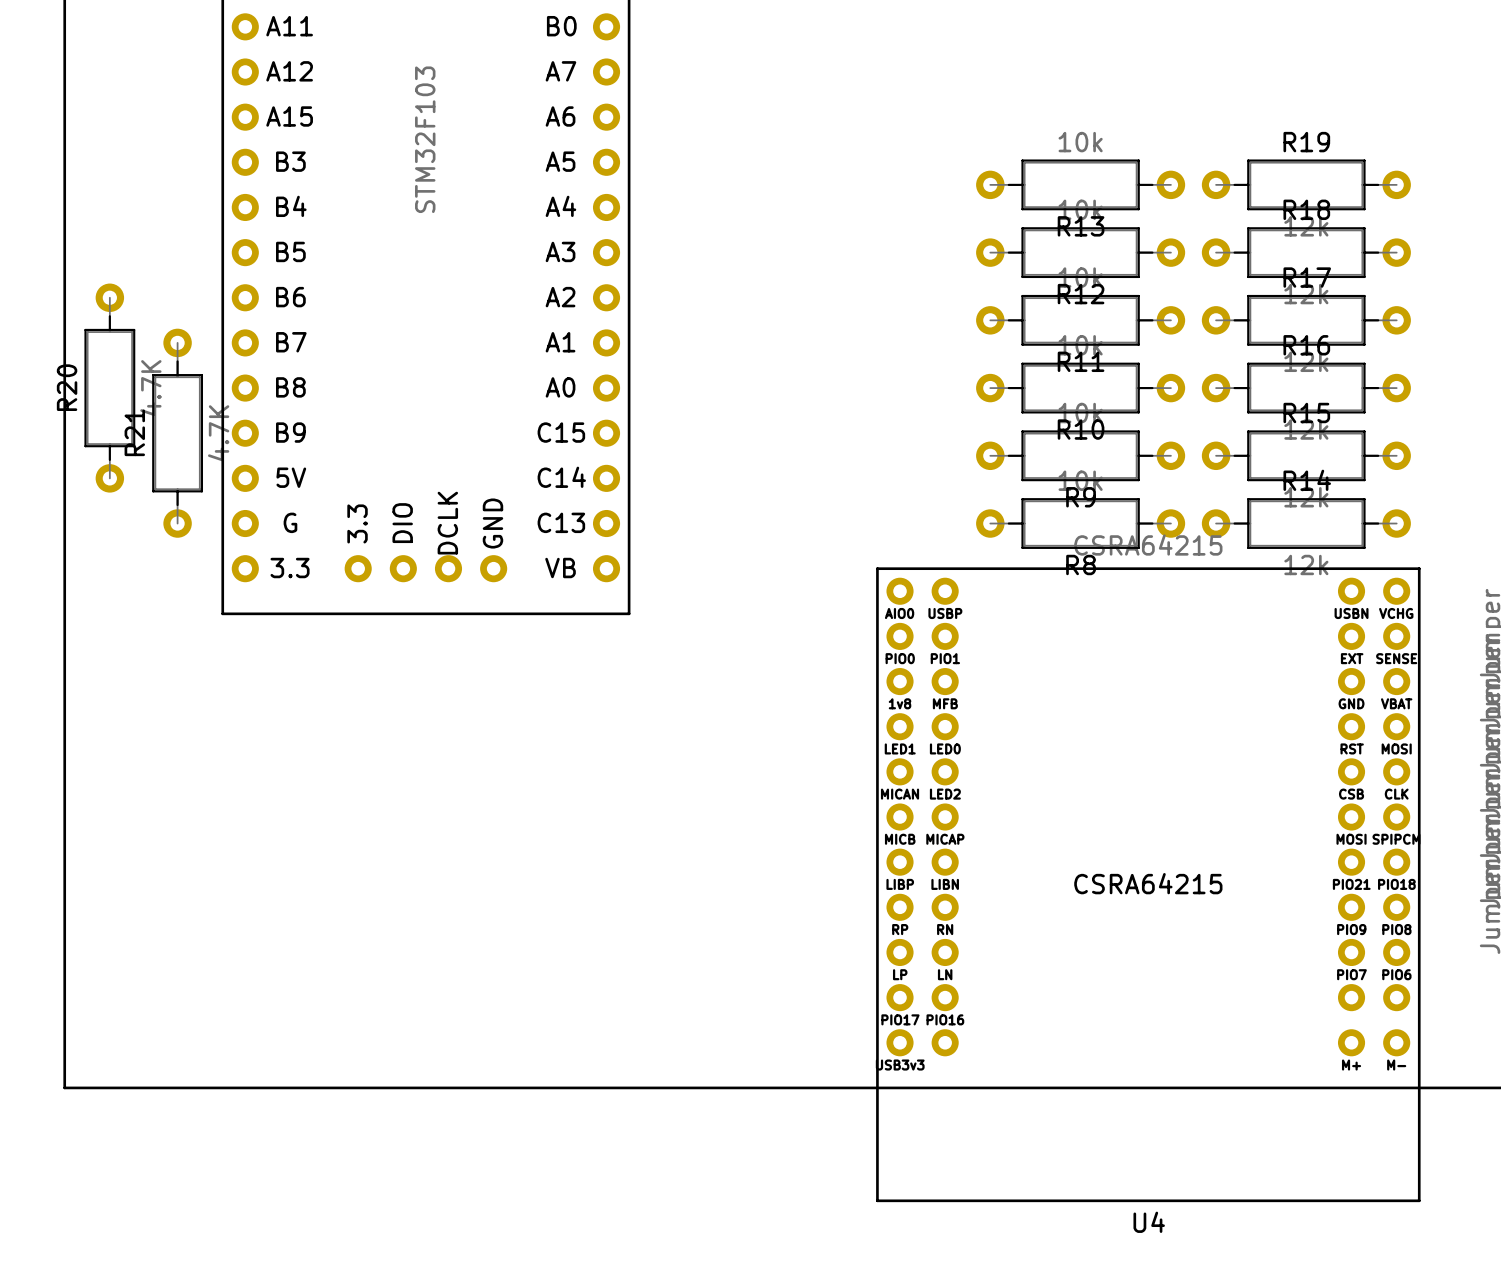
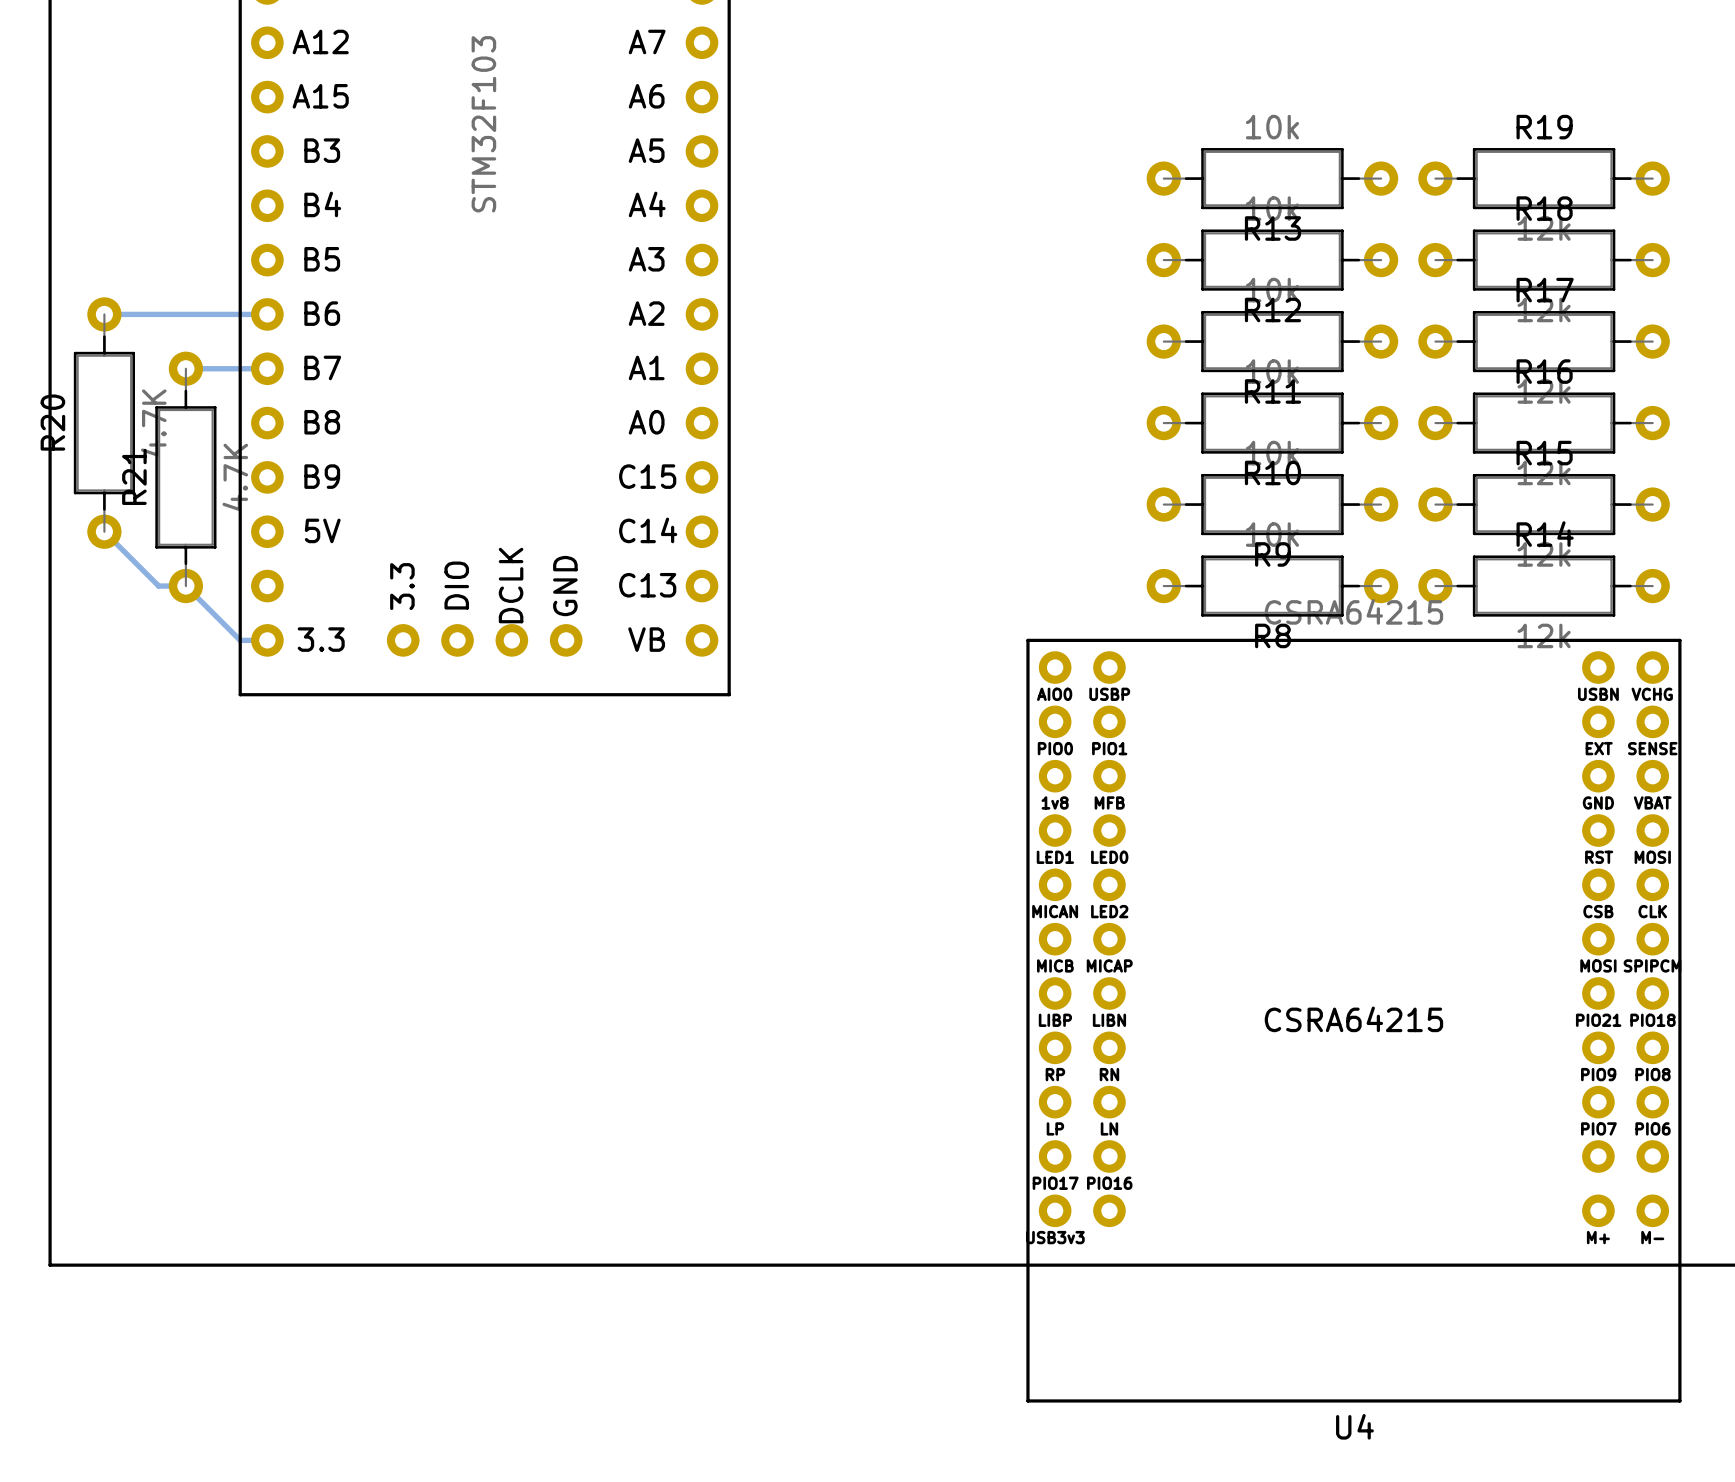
bottom track: none -> (104, 314) (267, 314)
bottom track: none -> (185, 368) (267, 368)
bottom track: none -> (104, 531) (158, 586) (185, 586) (240, 640) (267, 640)
part text: G (290, 522) -> none

